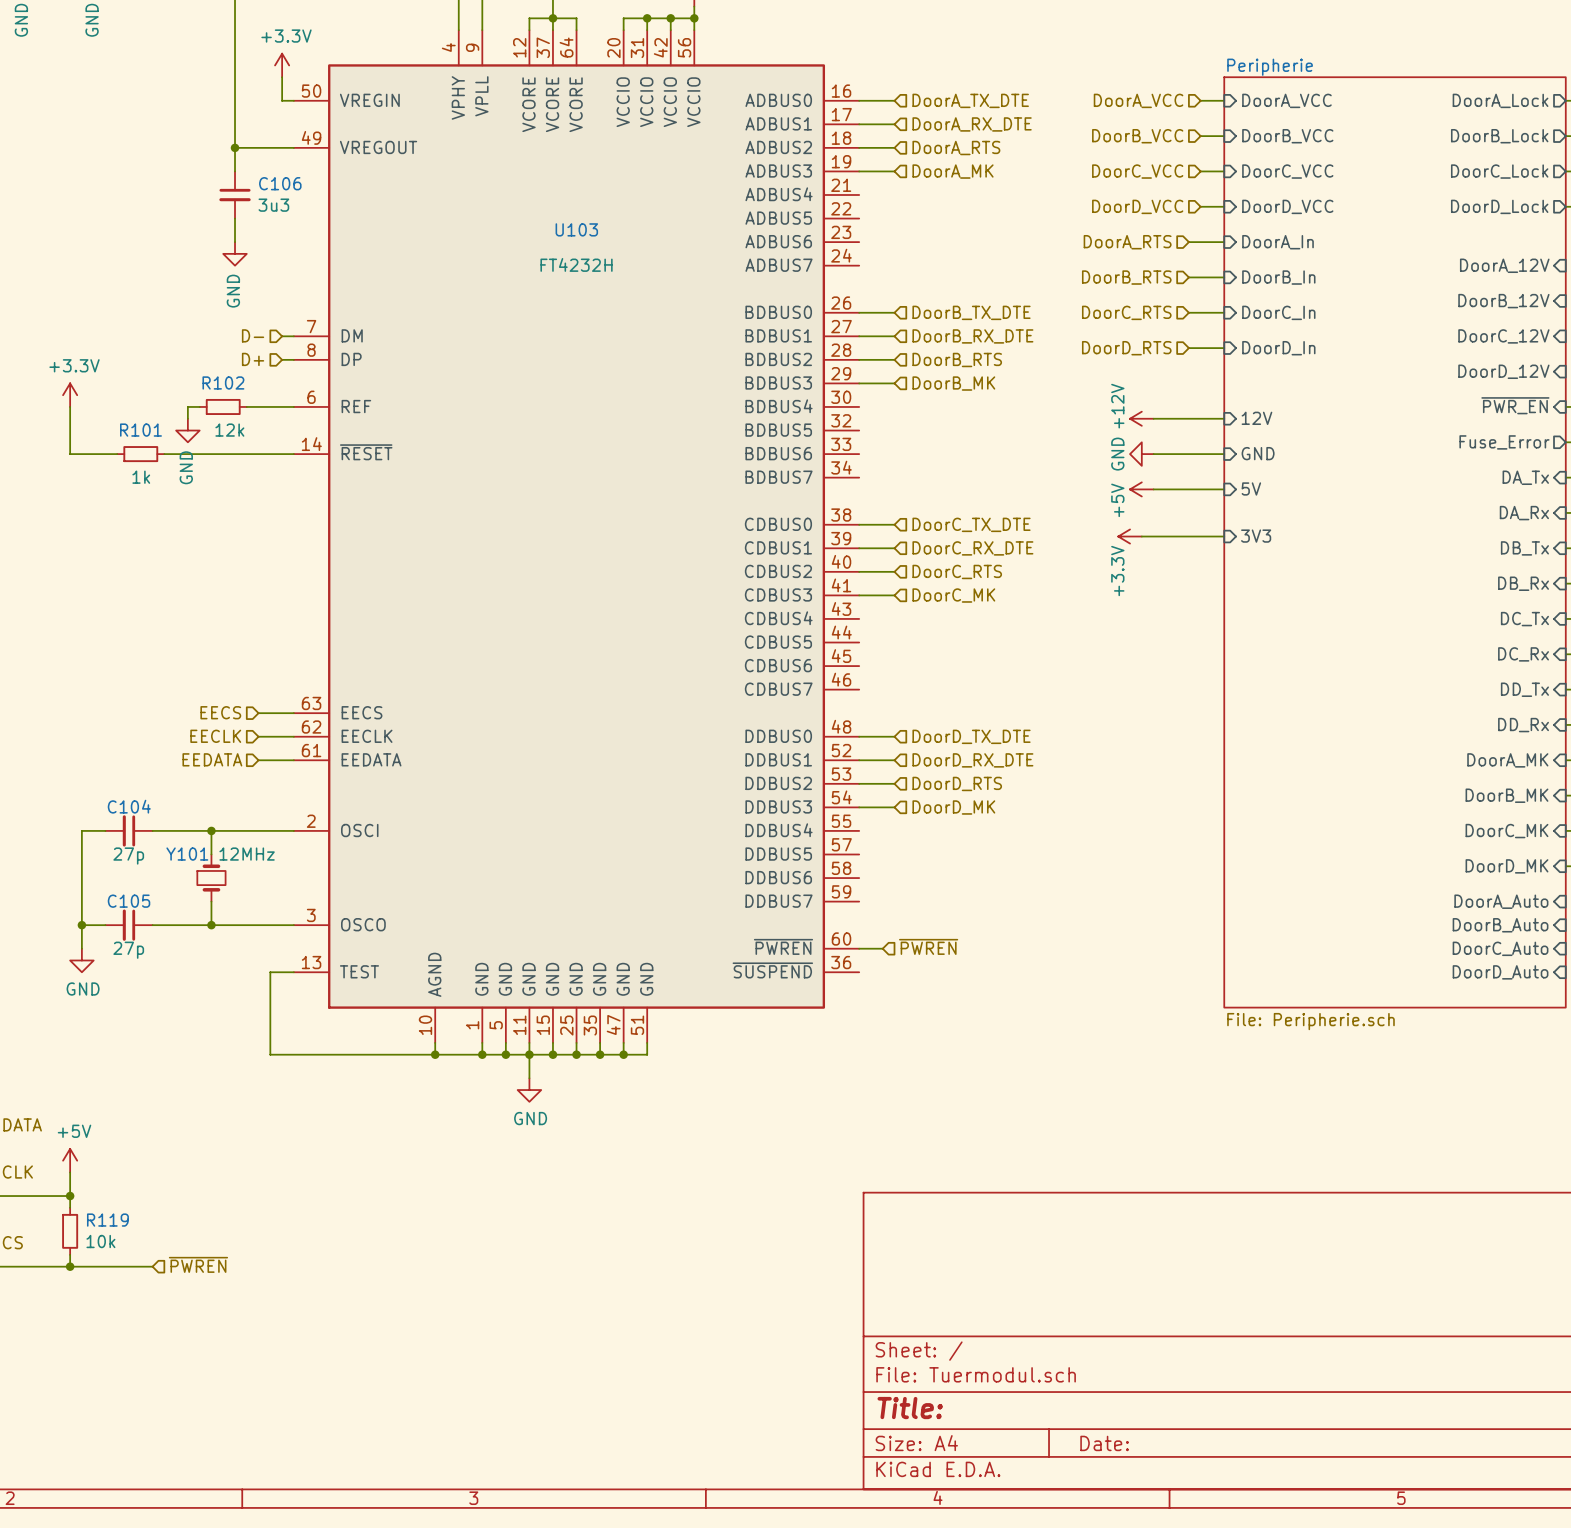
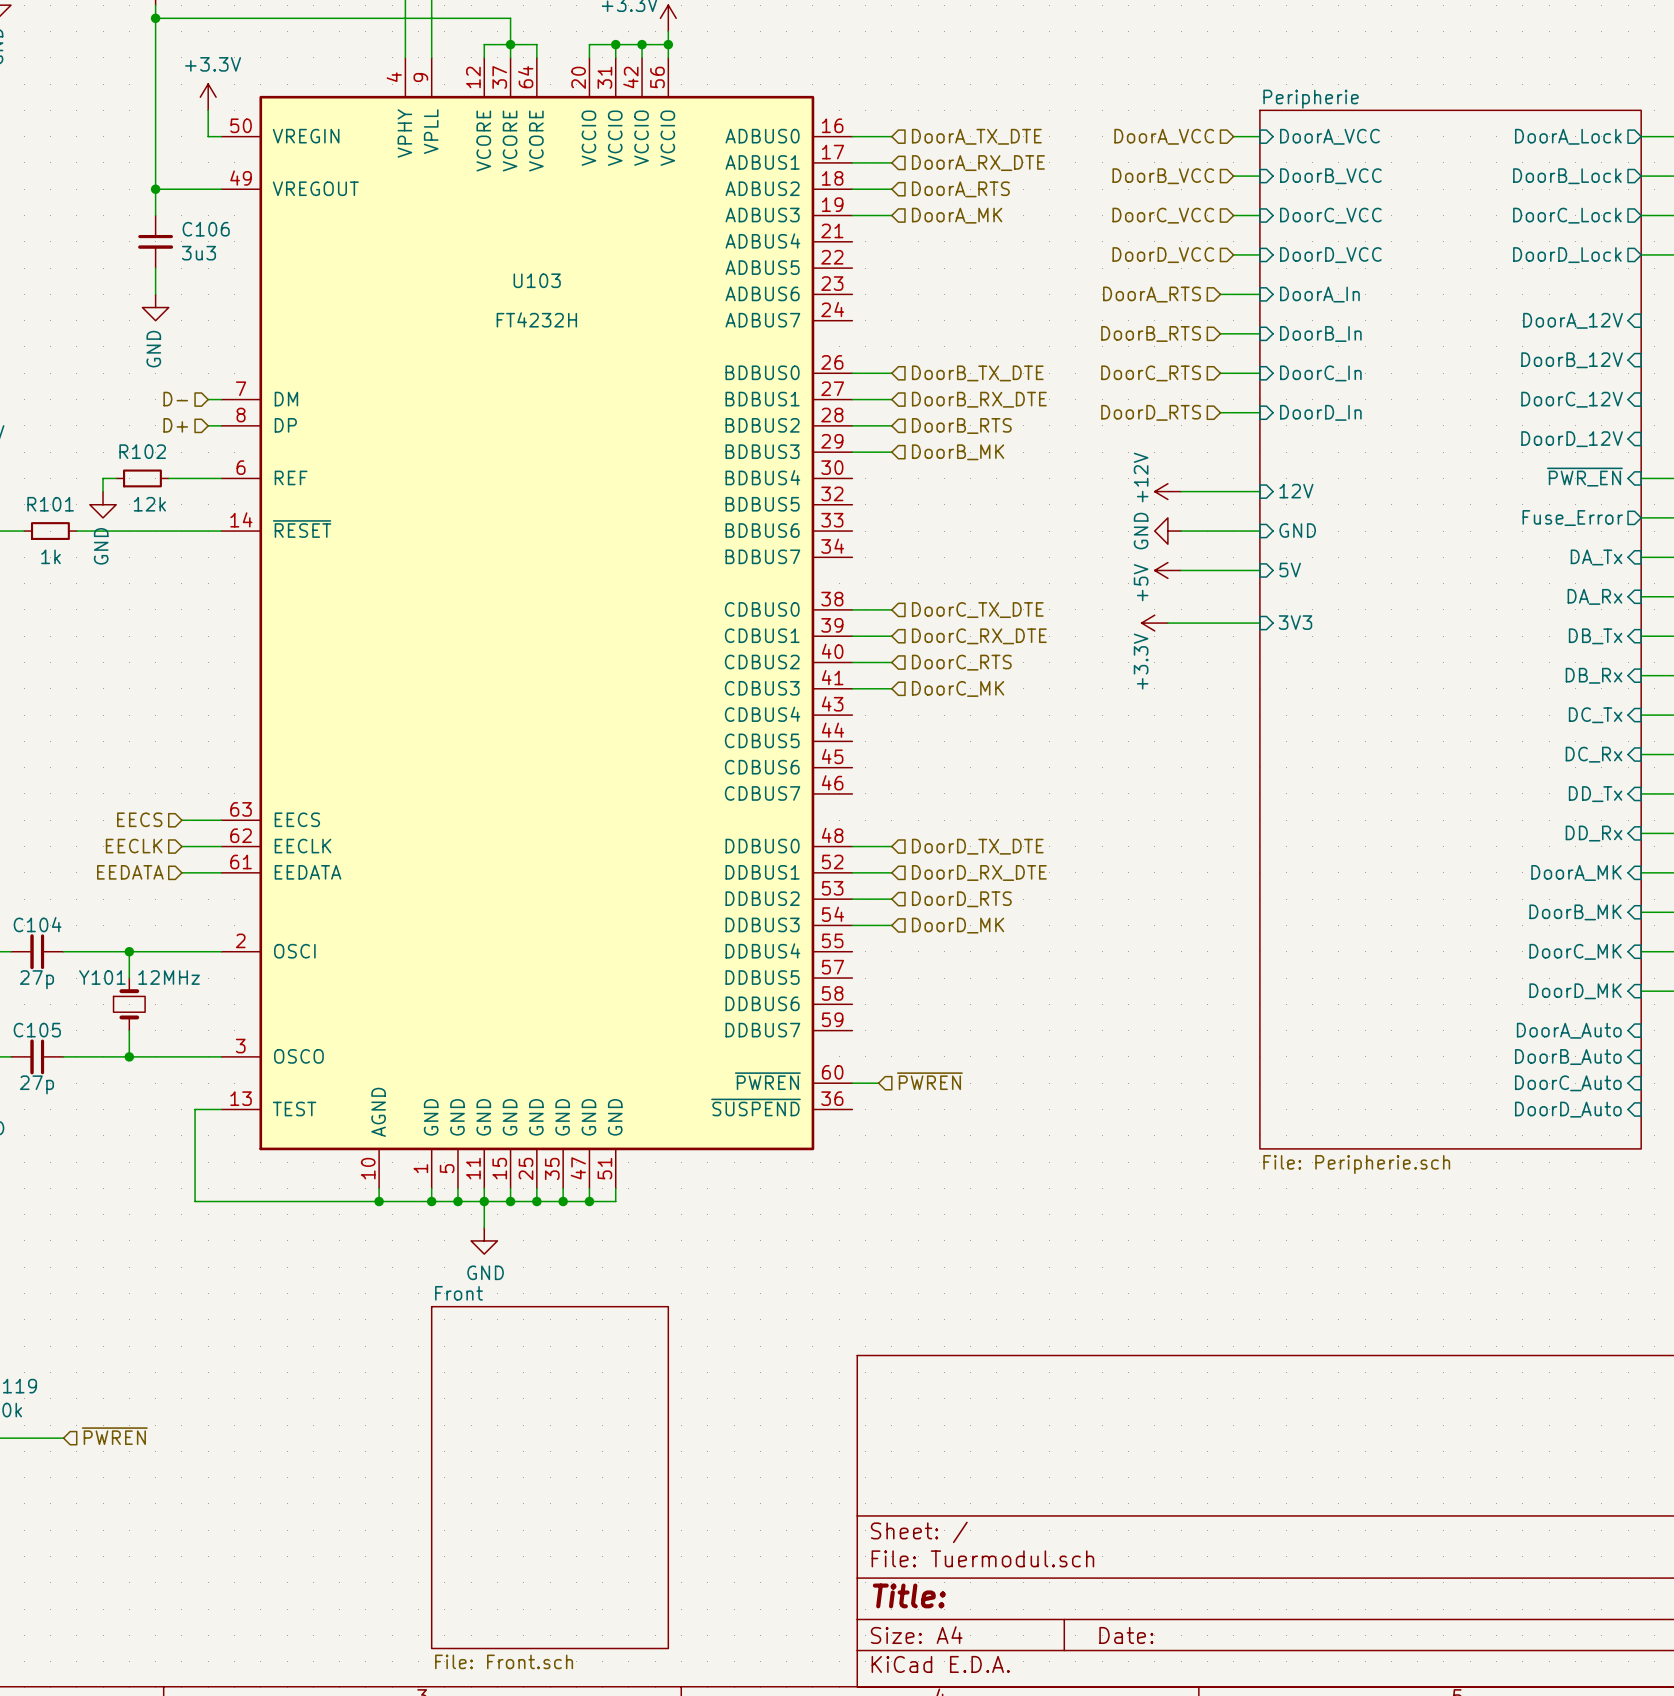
sheet Front: none -> File: Front.sch (550, 1477)

